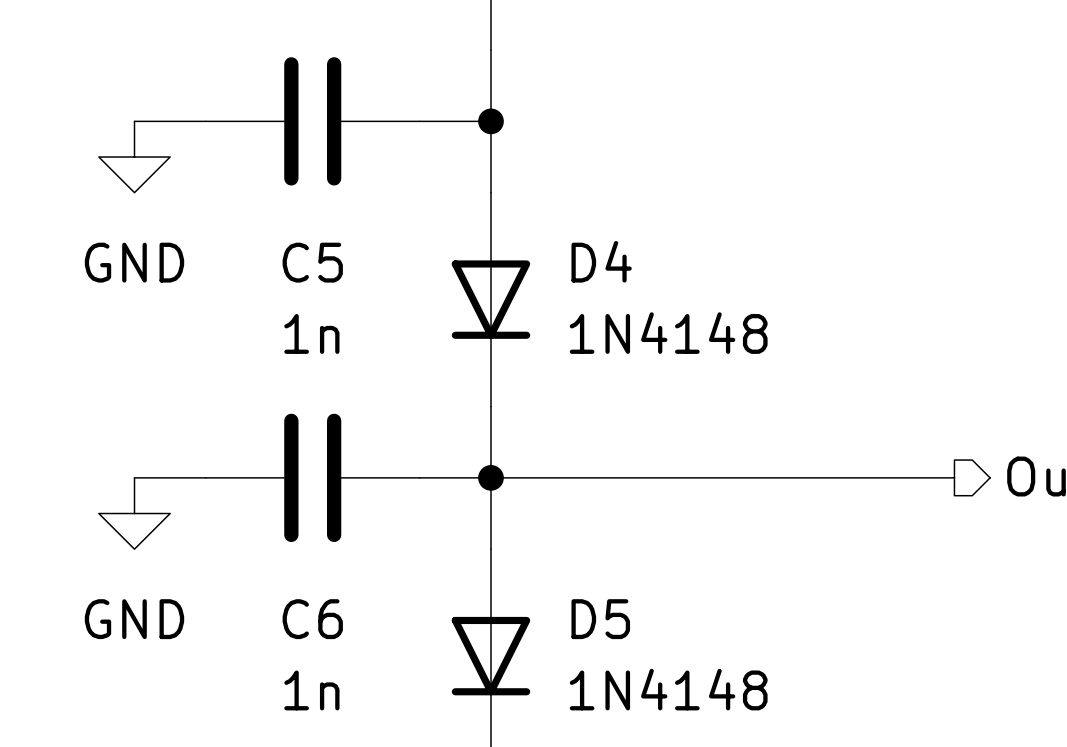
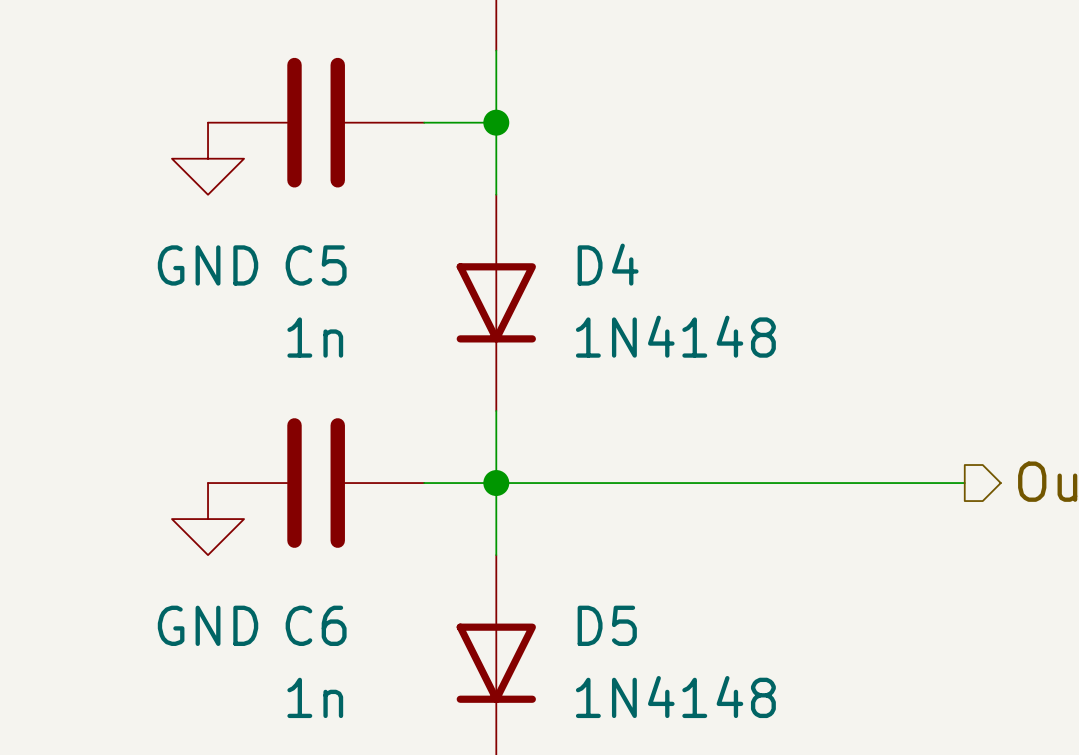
wire: (134, 121) (205, 121) -> none
power symbol position: GND (134, 157) -> GND (208, 158)
wire: (134, 477) (205, 477) -> none
power symbol position: GND (134, 513) -> GND (208, 519)

